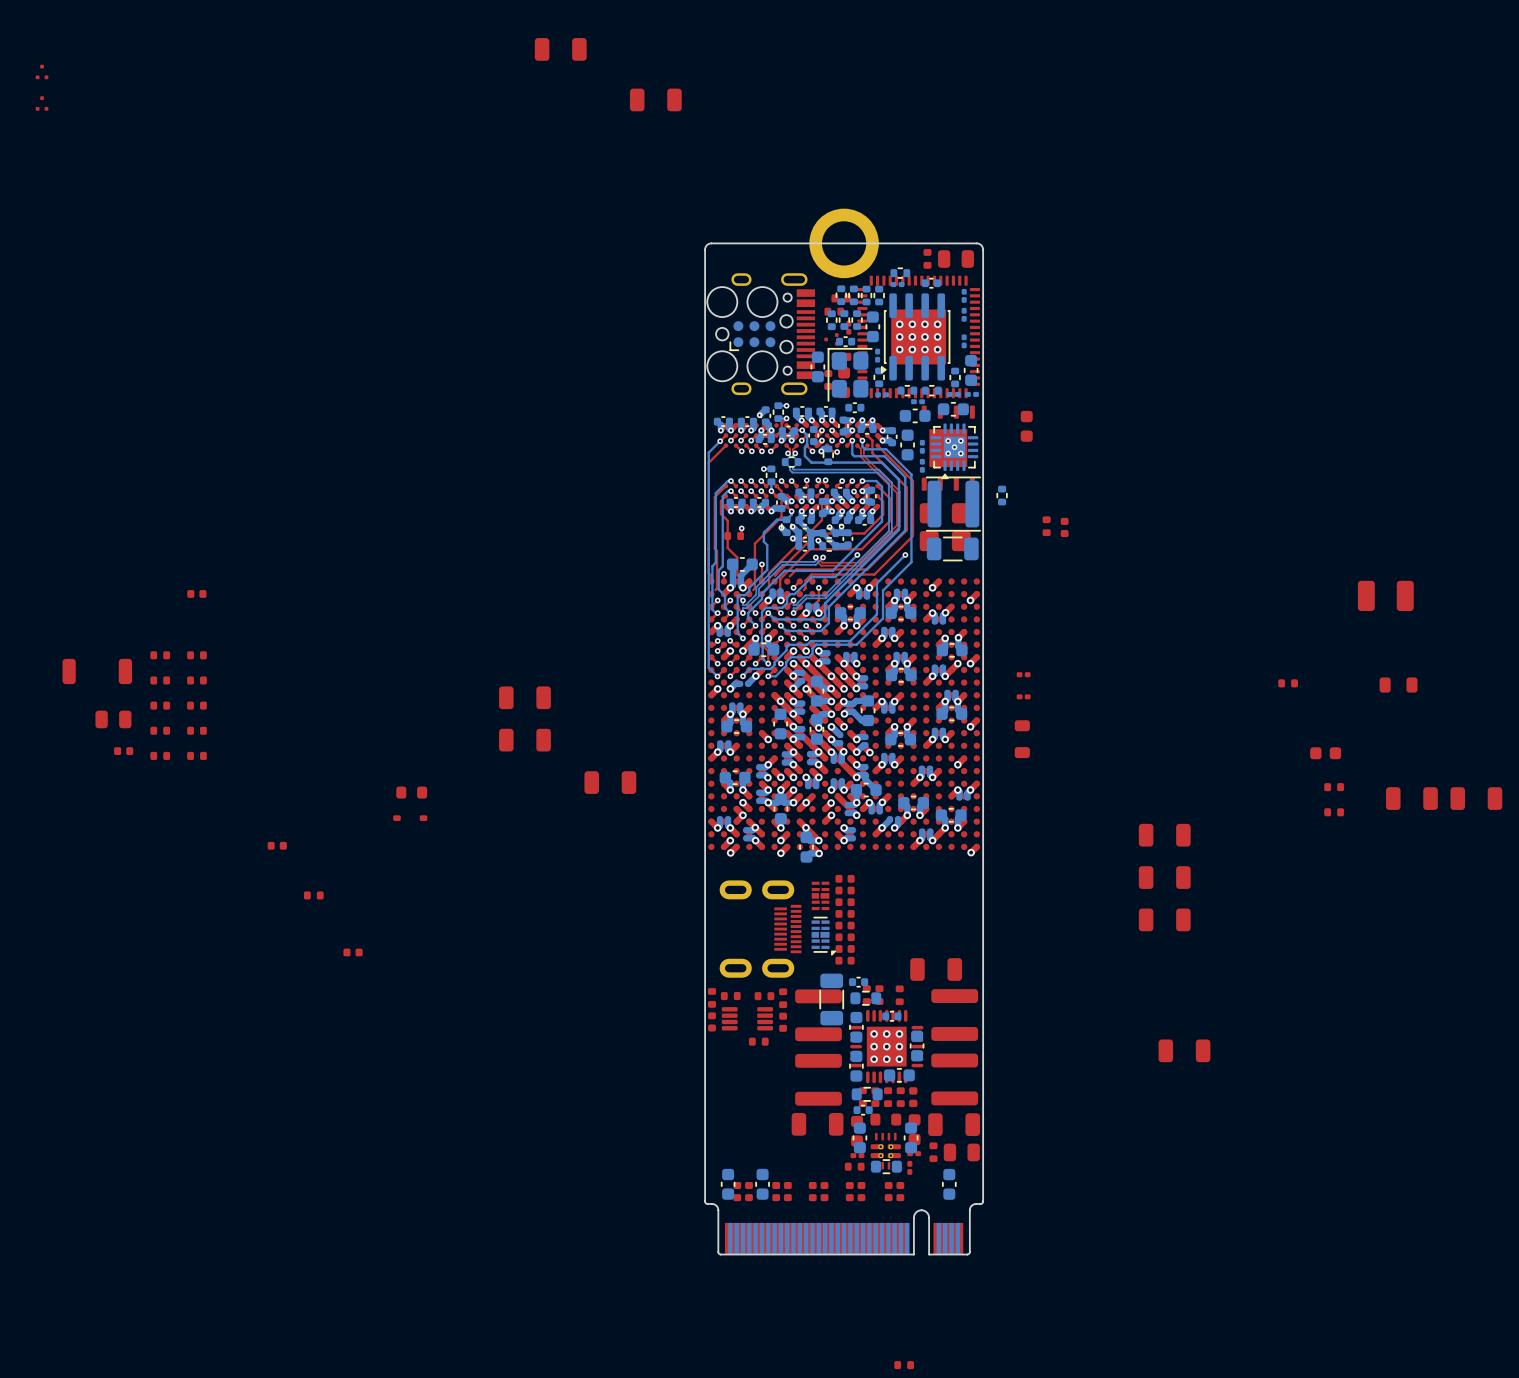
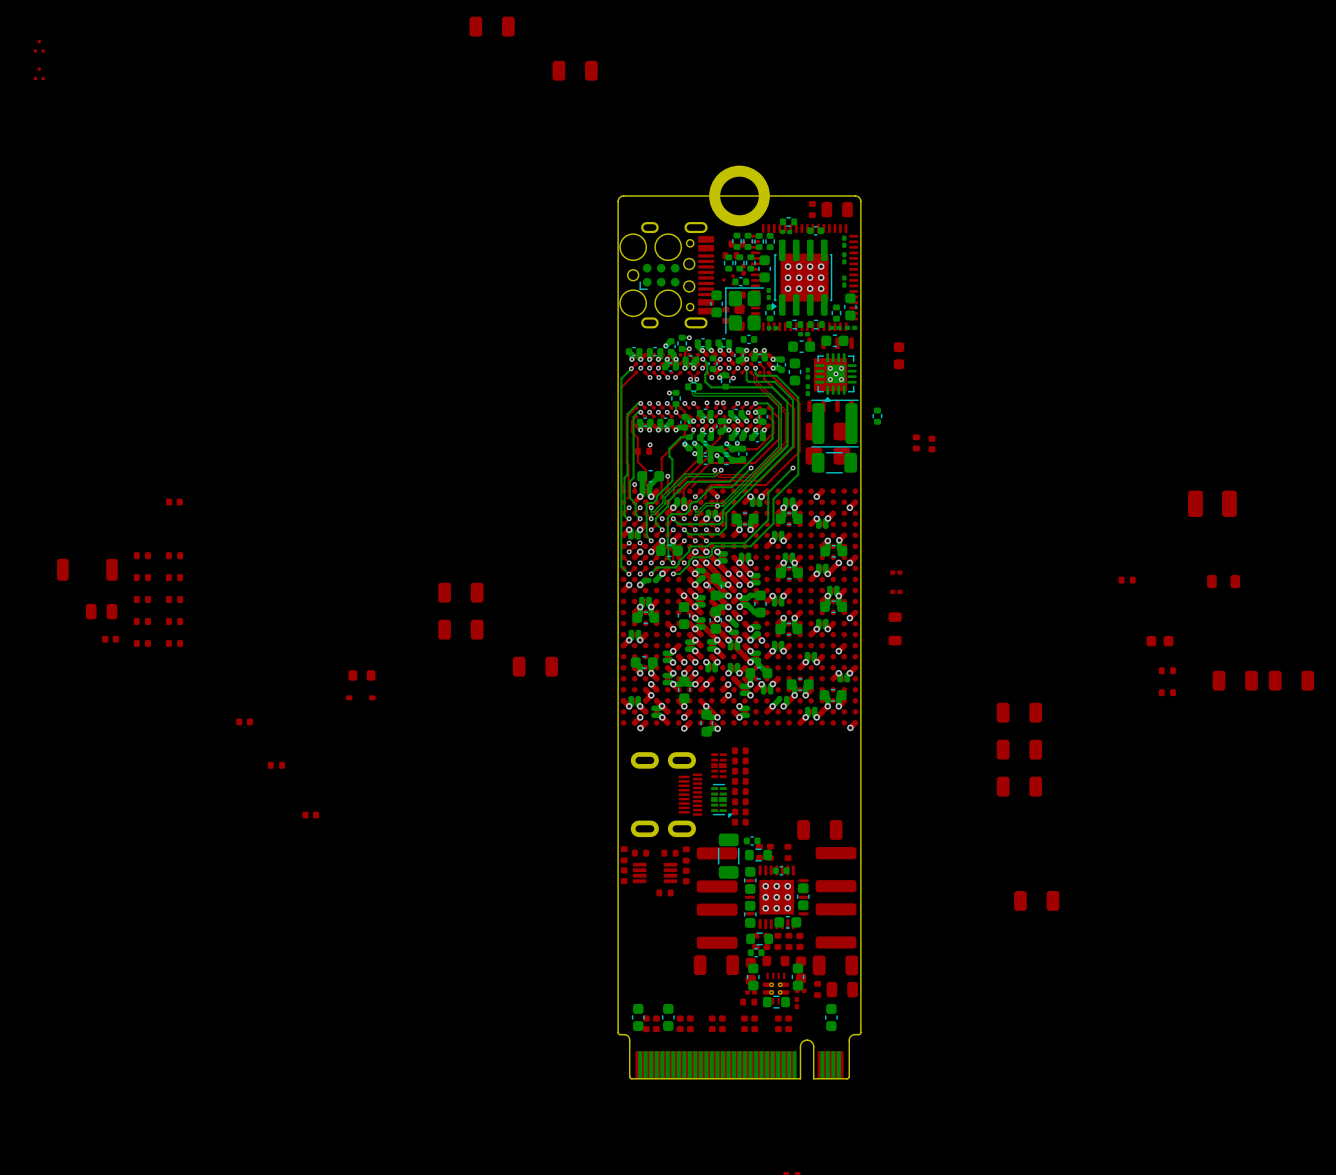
top track: none -> (711, 491) (715, 495)
via: none -> (717, 506)

